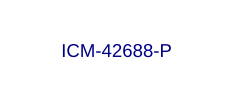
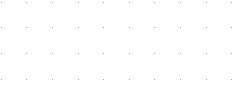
text: ICM-42688-P (116, 50) -> none

